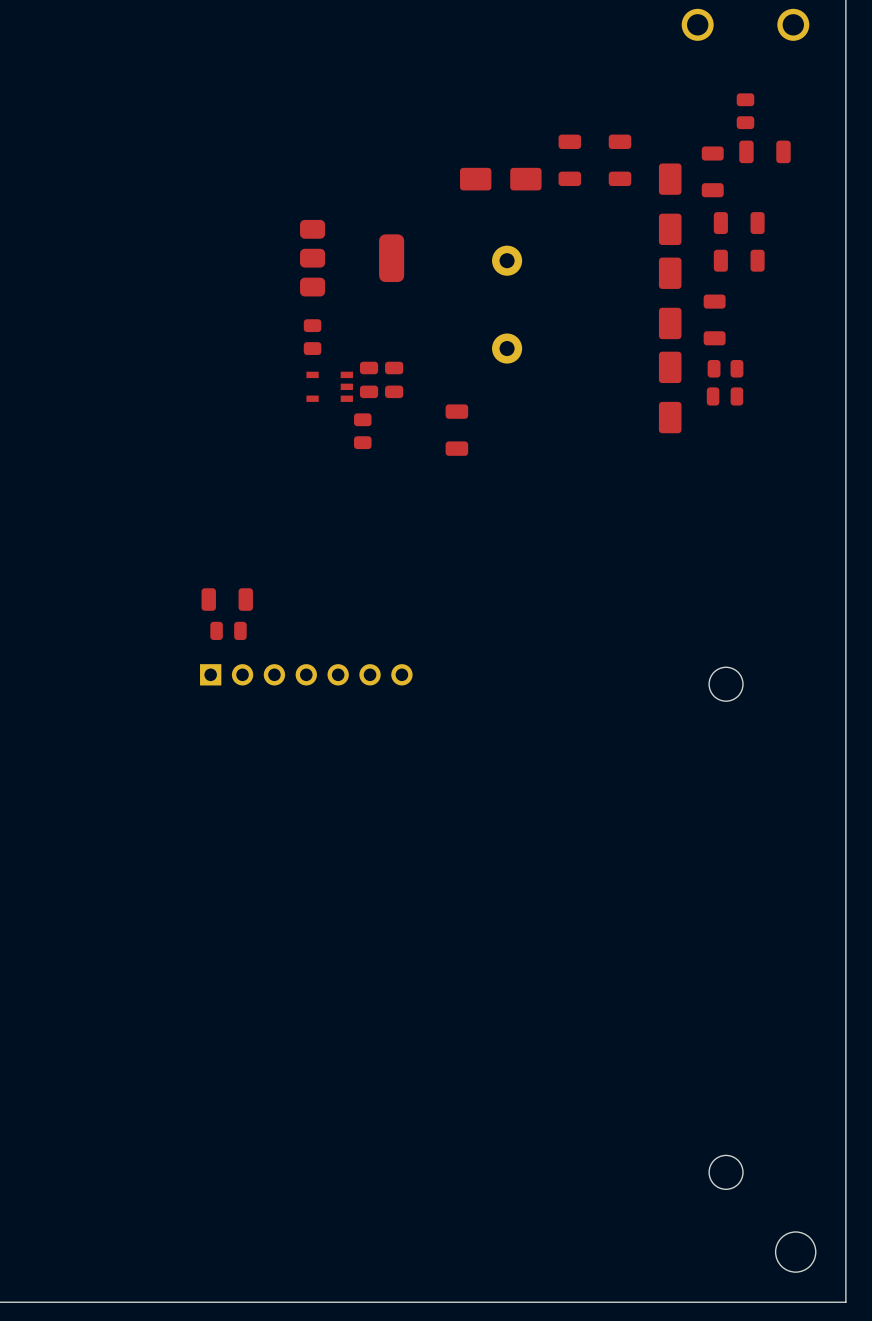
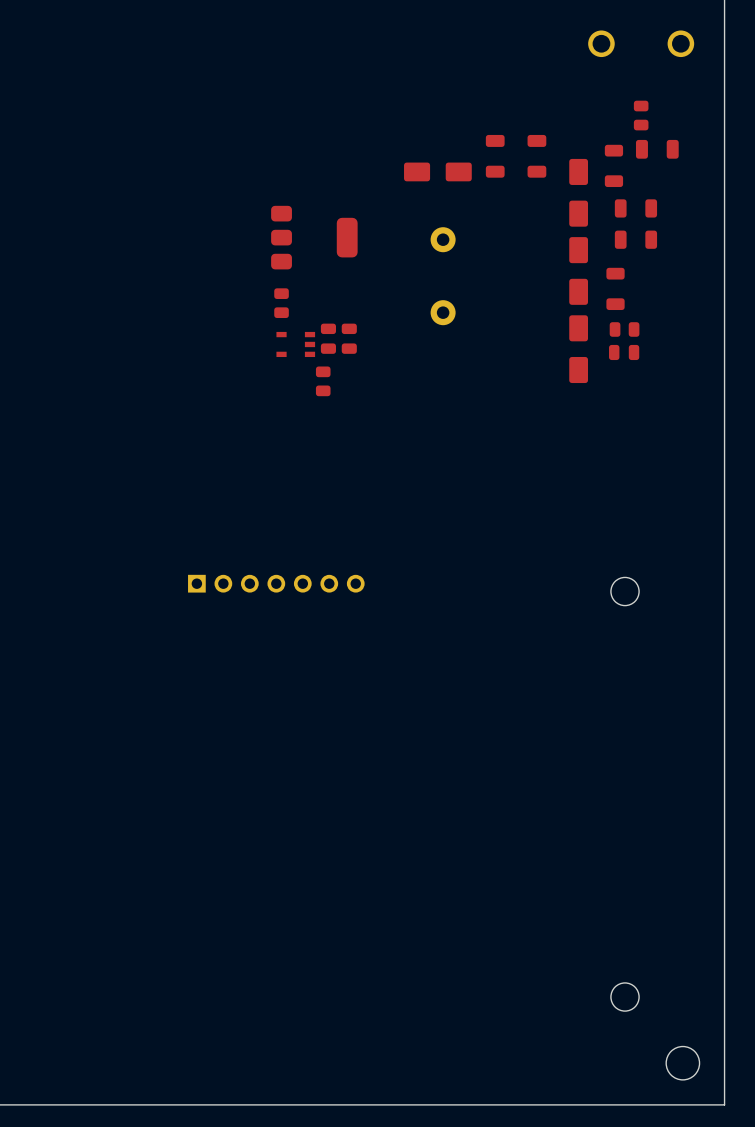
part: (456, 430) -> none
part: (227, 599) -> none
part: (228, 630) -> none

